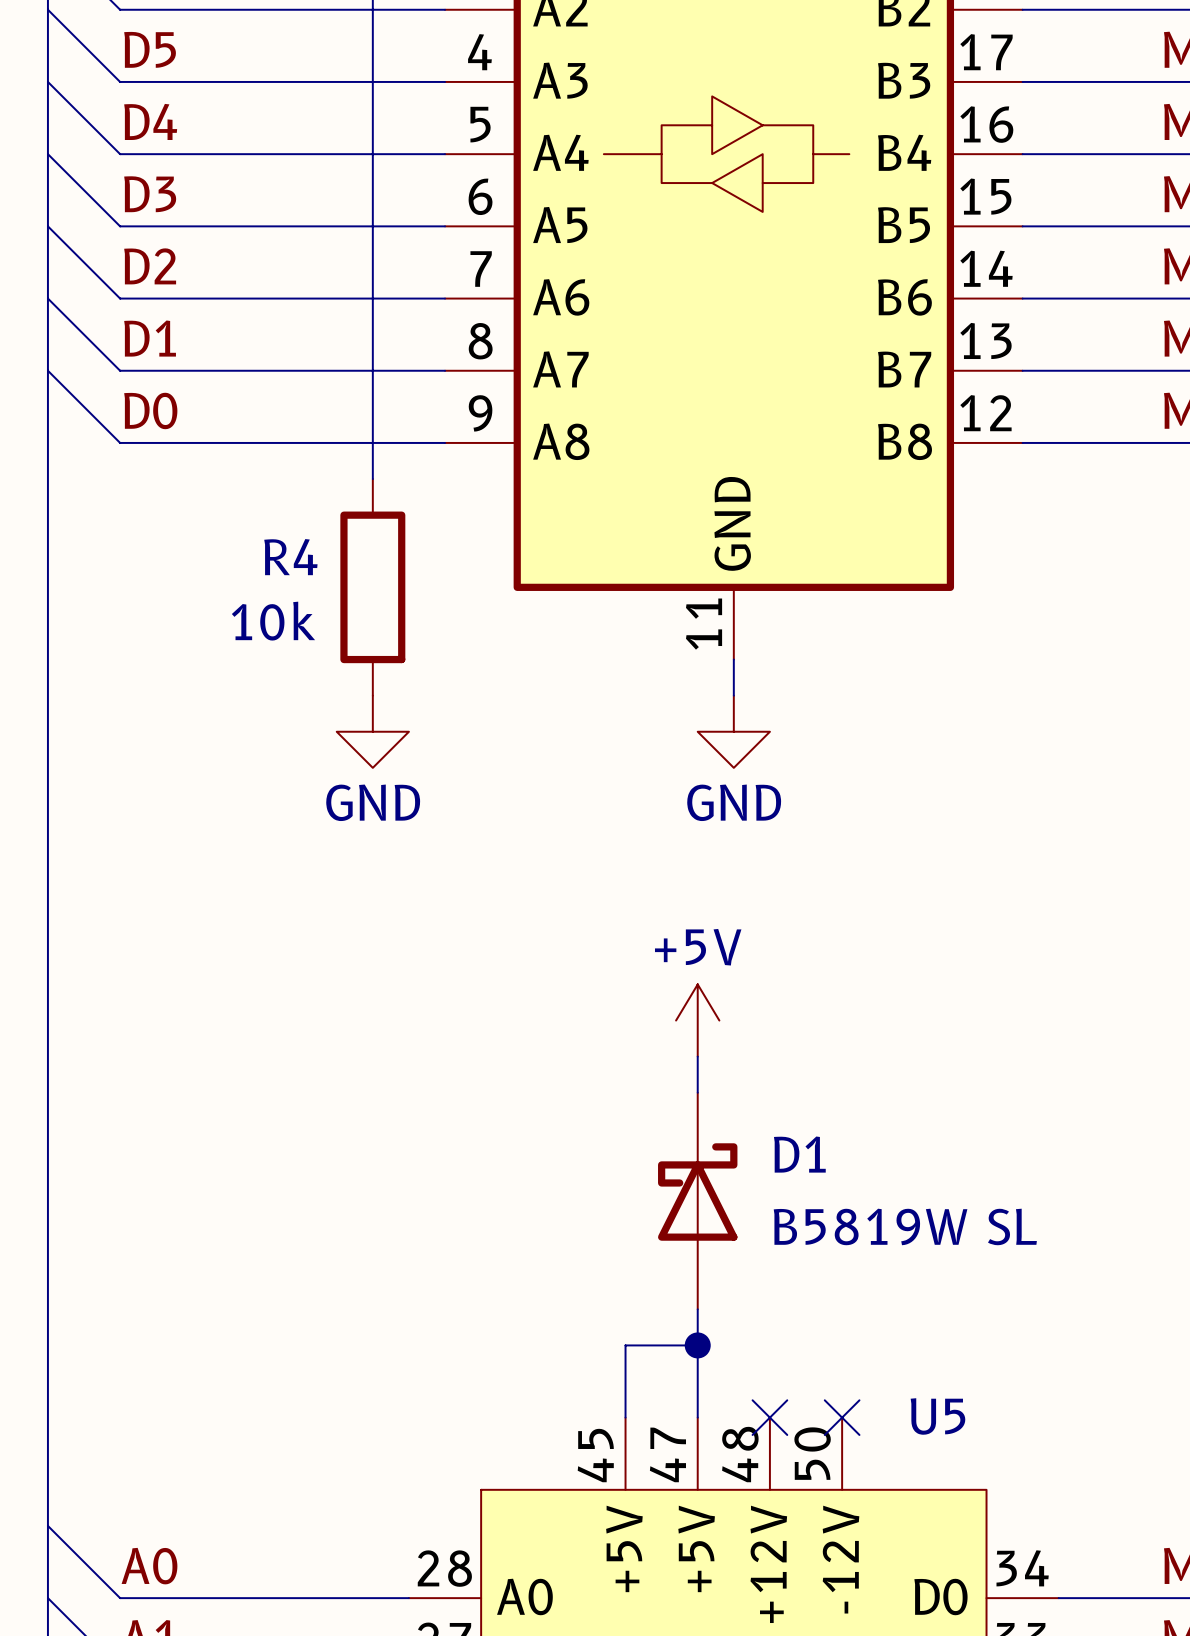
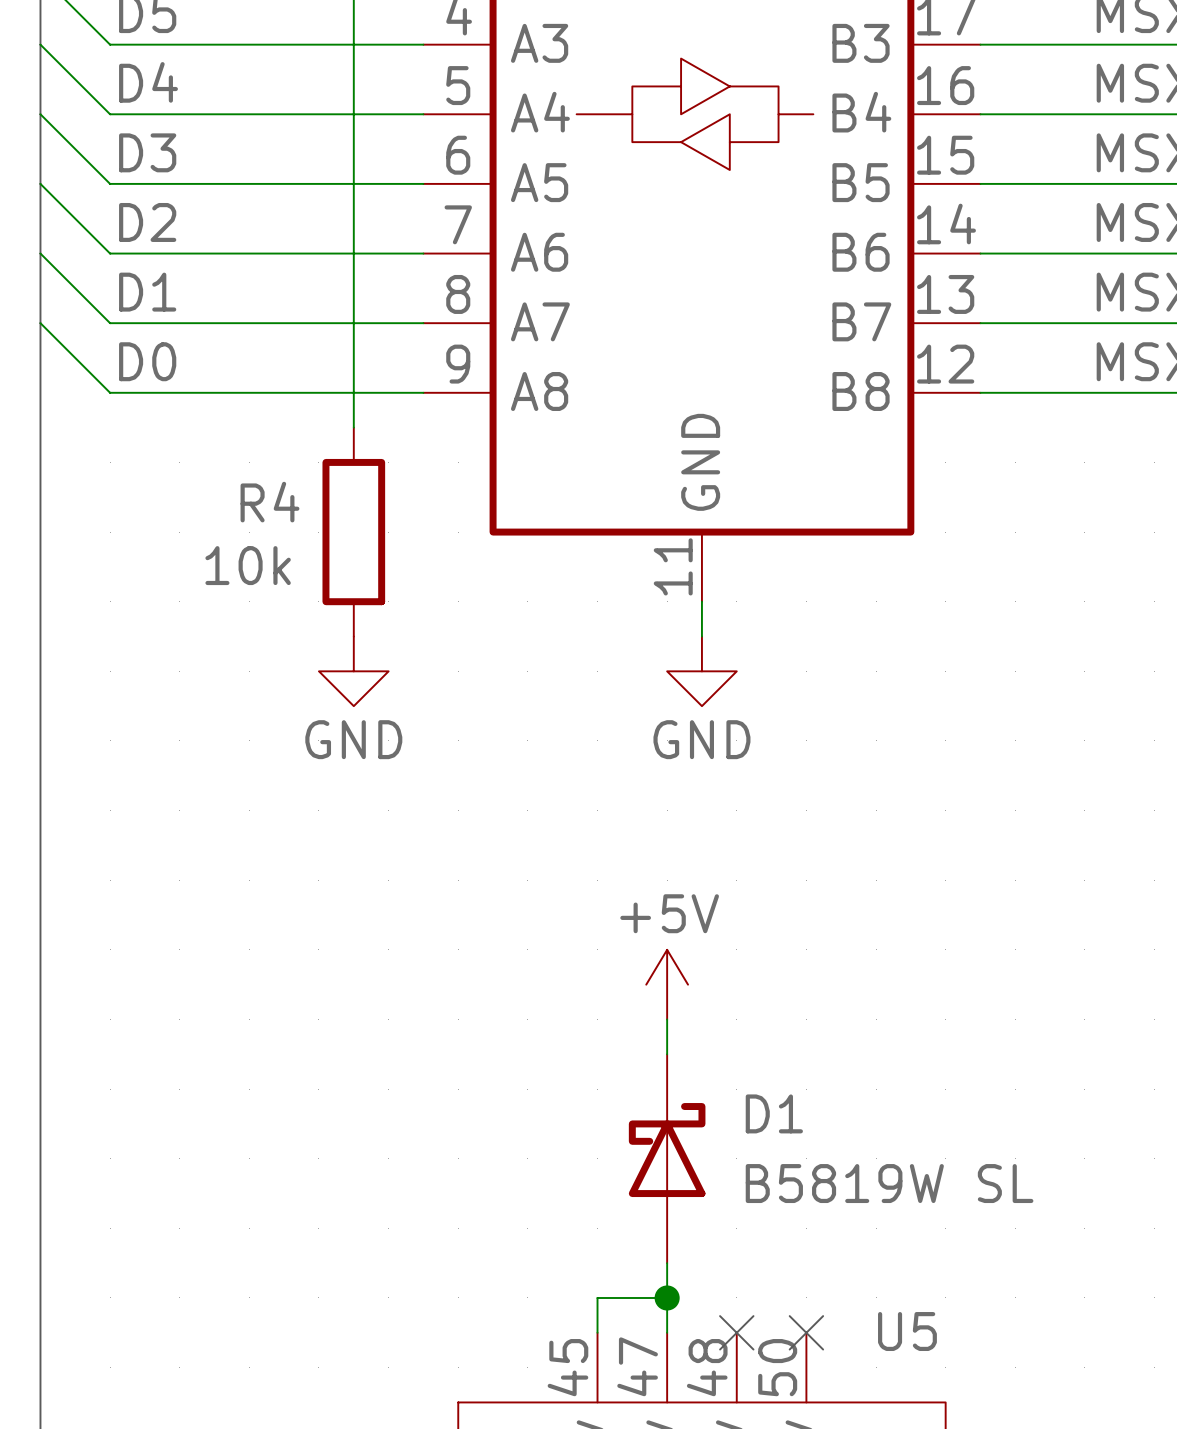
power symbol position: +5V (697, 1020) -> +5V (667, 984)
D1 position: (697, 1201) -> (667, 1158)
wire: (697, 1309) (697, 1345) (625, 1345) (625, 1381) -> (667, 1297) (597, 1297)
junction position: (697, 1345) -> (667, 1297)

